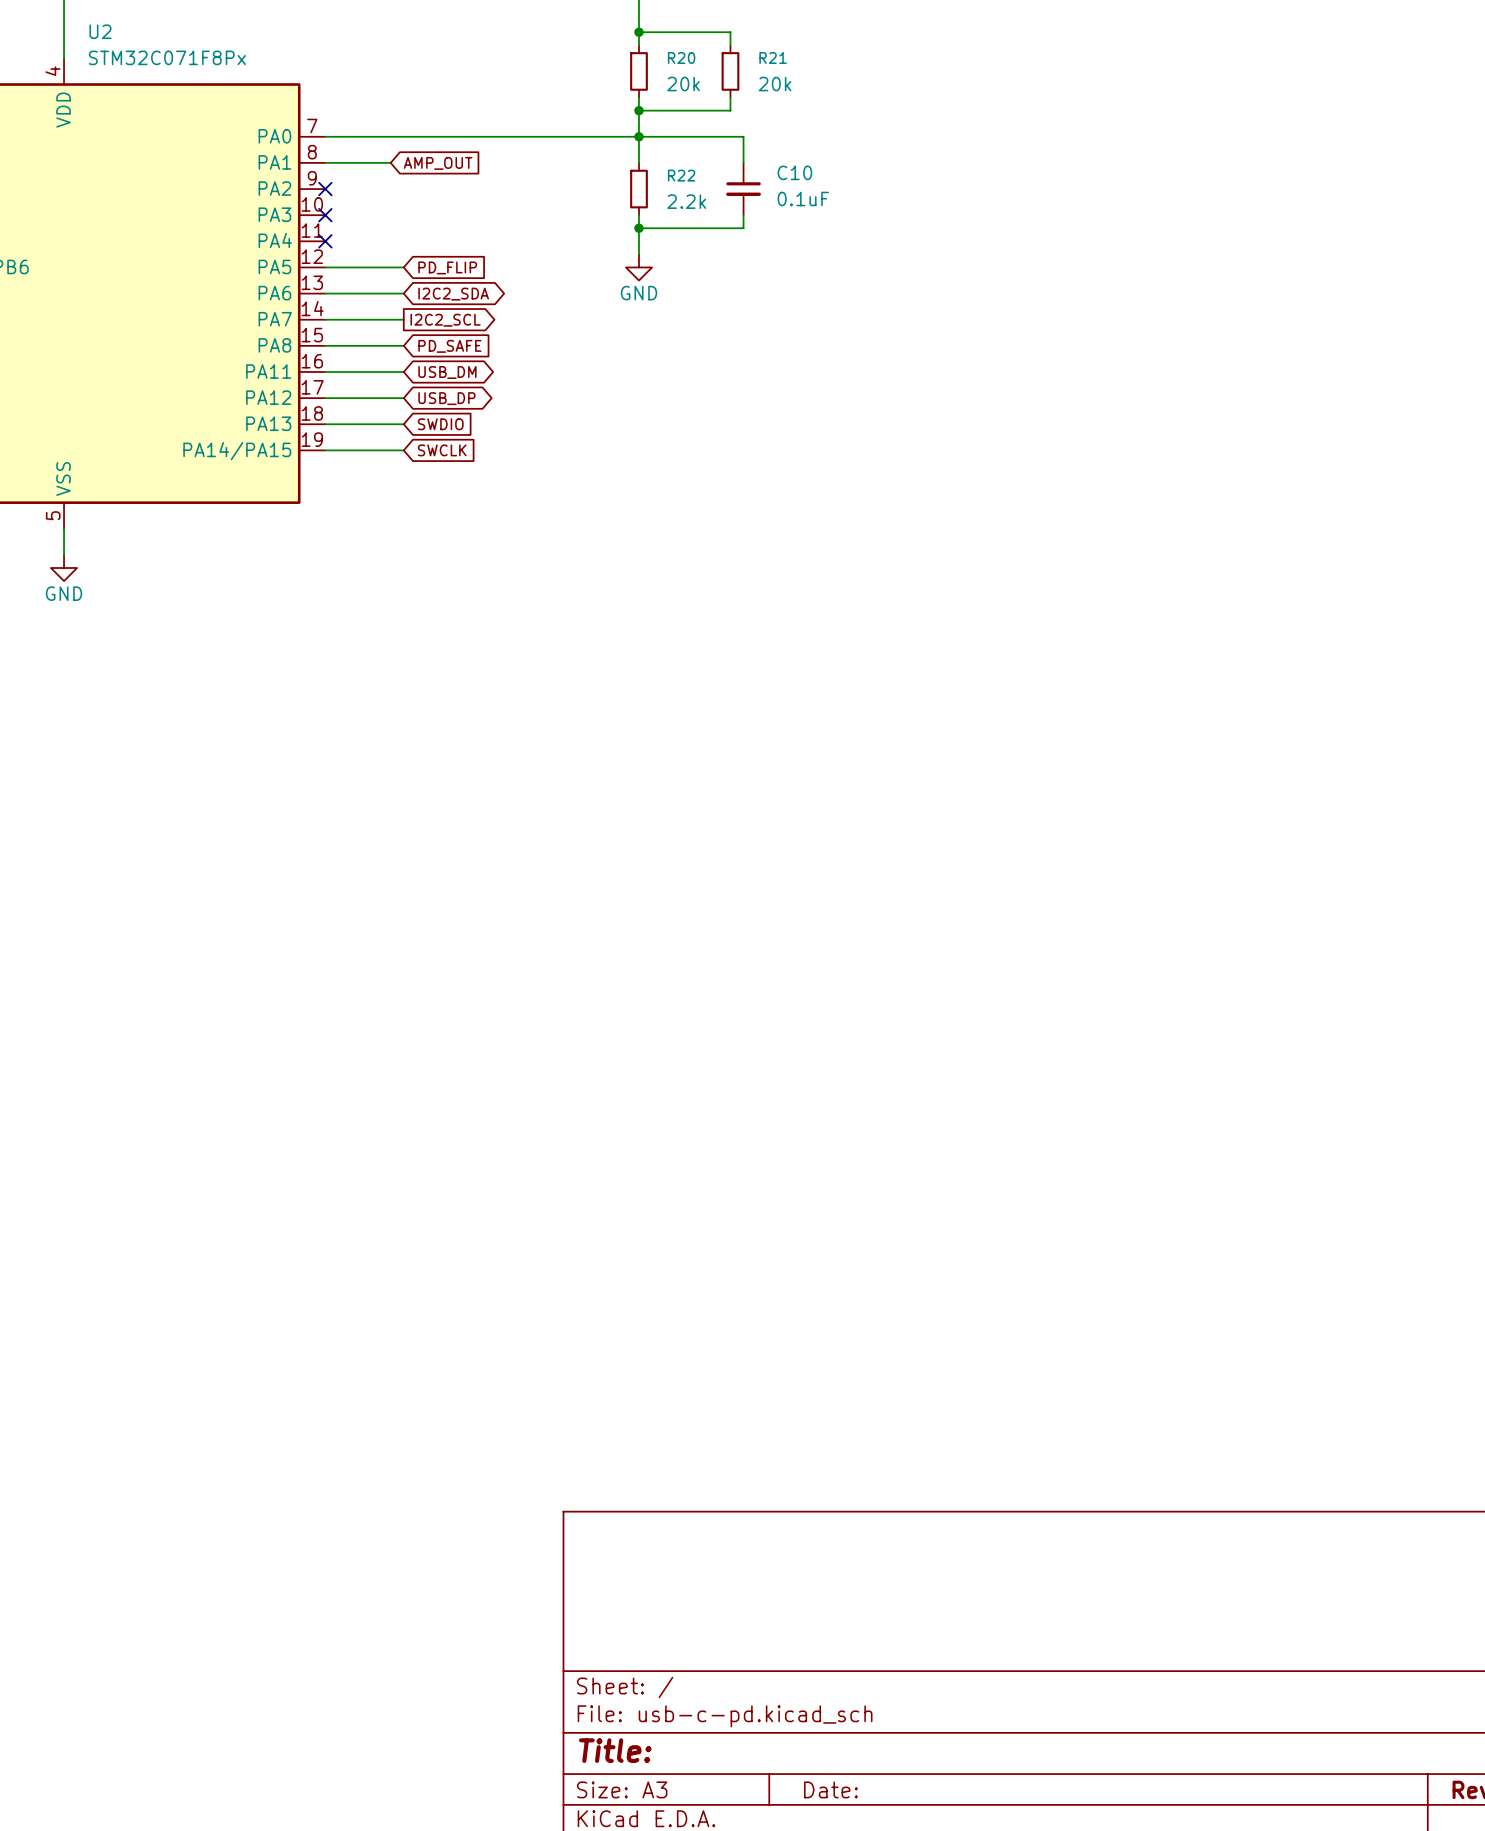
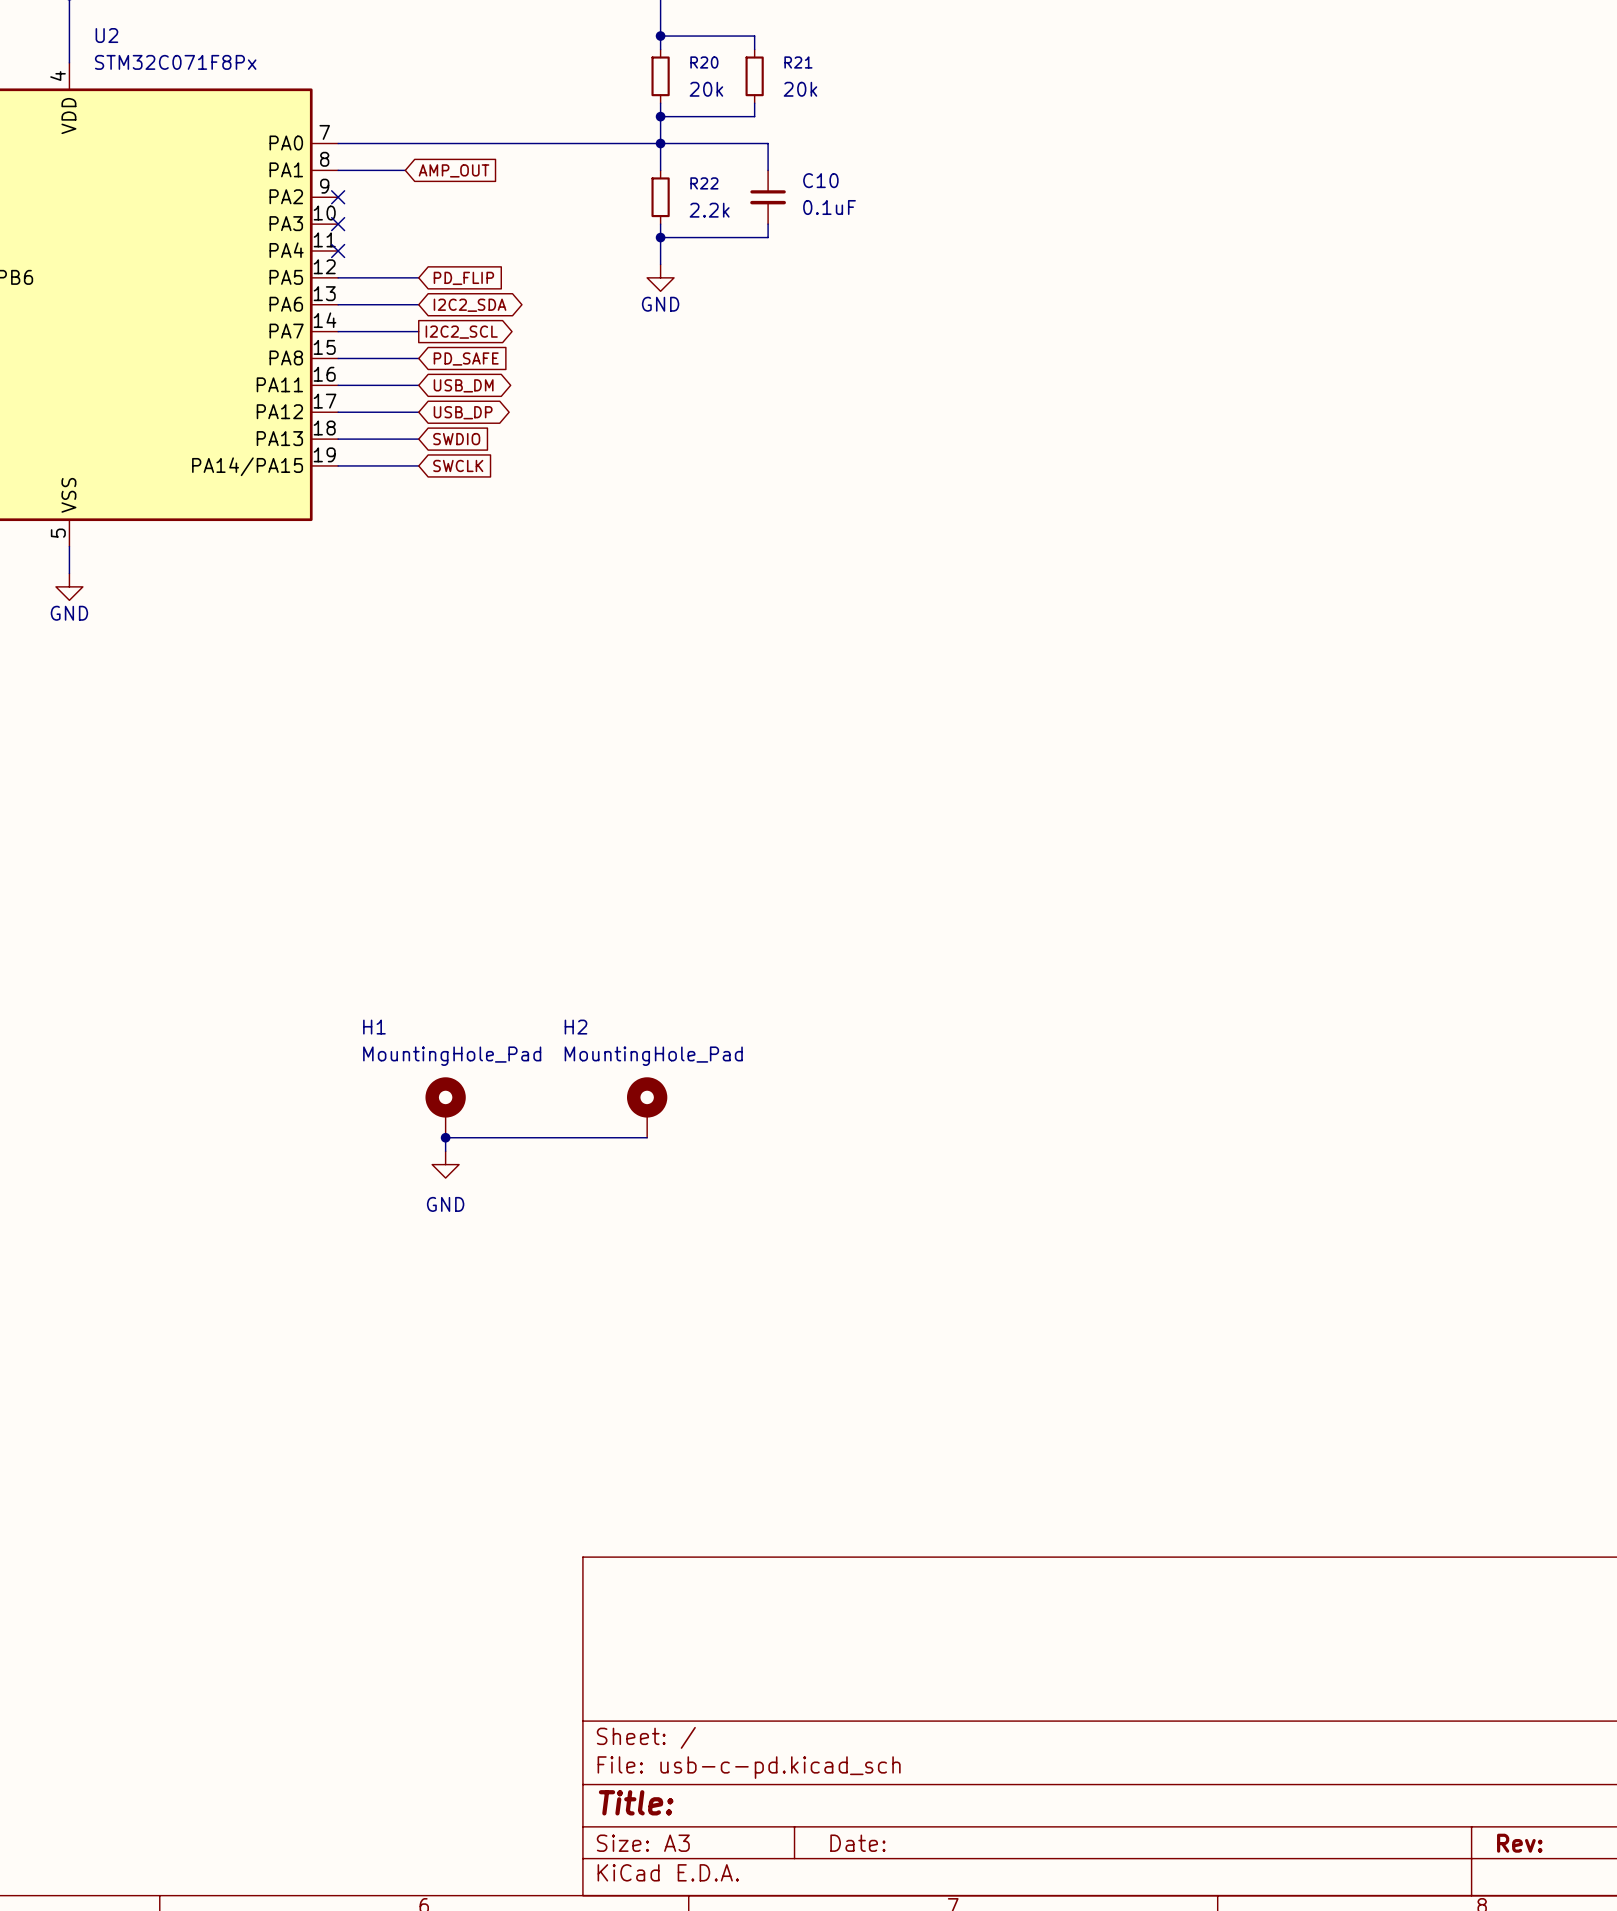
H1: none -> MountingHole_Pad (445, 1107)
H2: none -> MountingHole_Pad (647, 1107)
junction: none -> (445, 1137)
wire: none -> (647, 1137) (445, 1137) (445, 1151)
power symbol: none -> GND (445, 1164)

